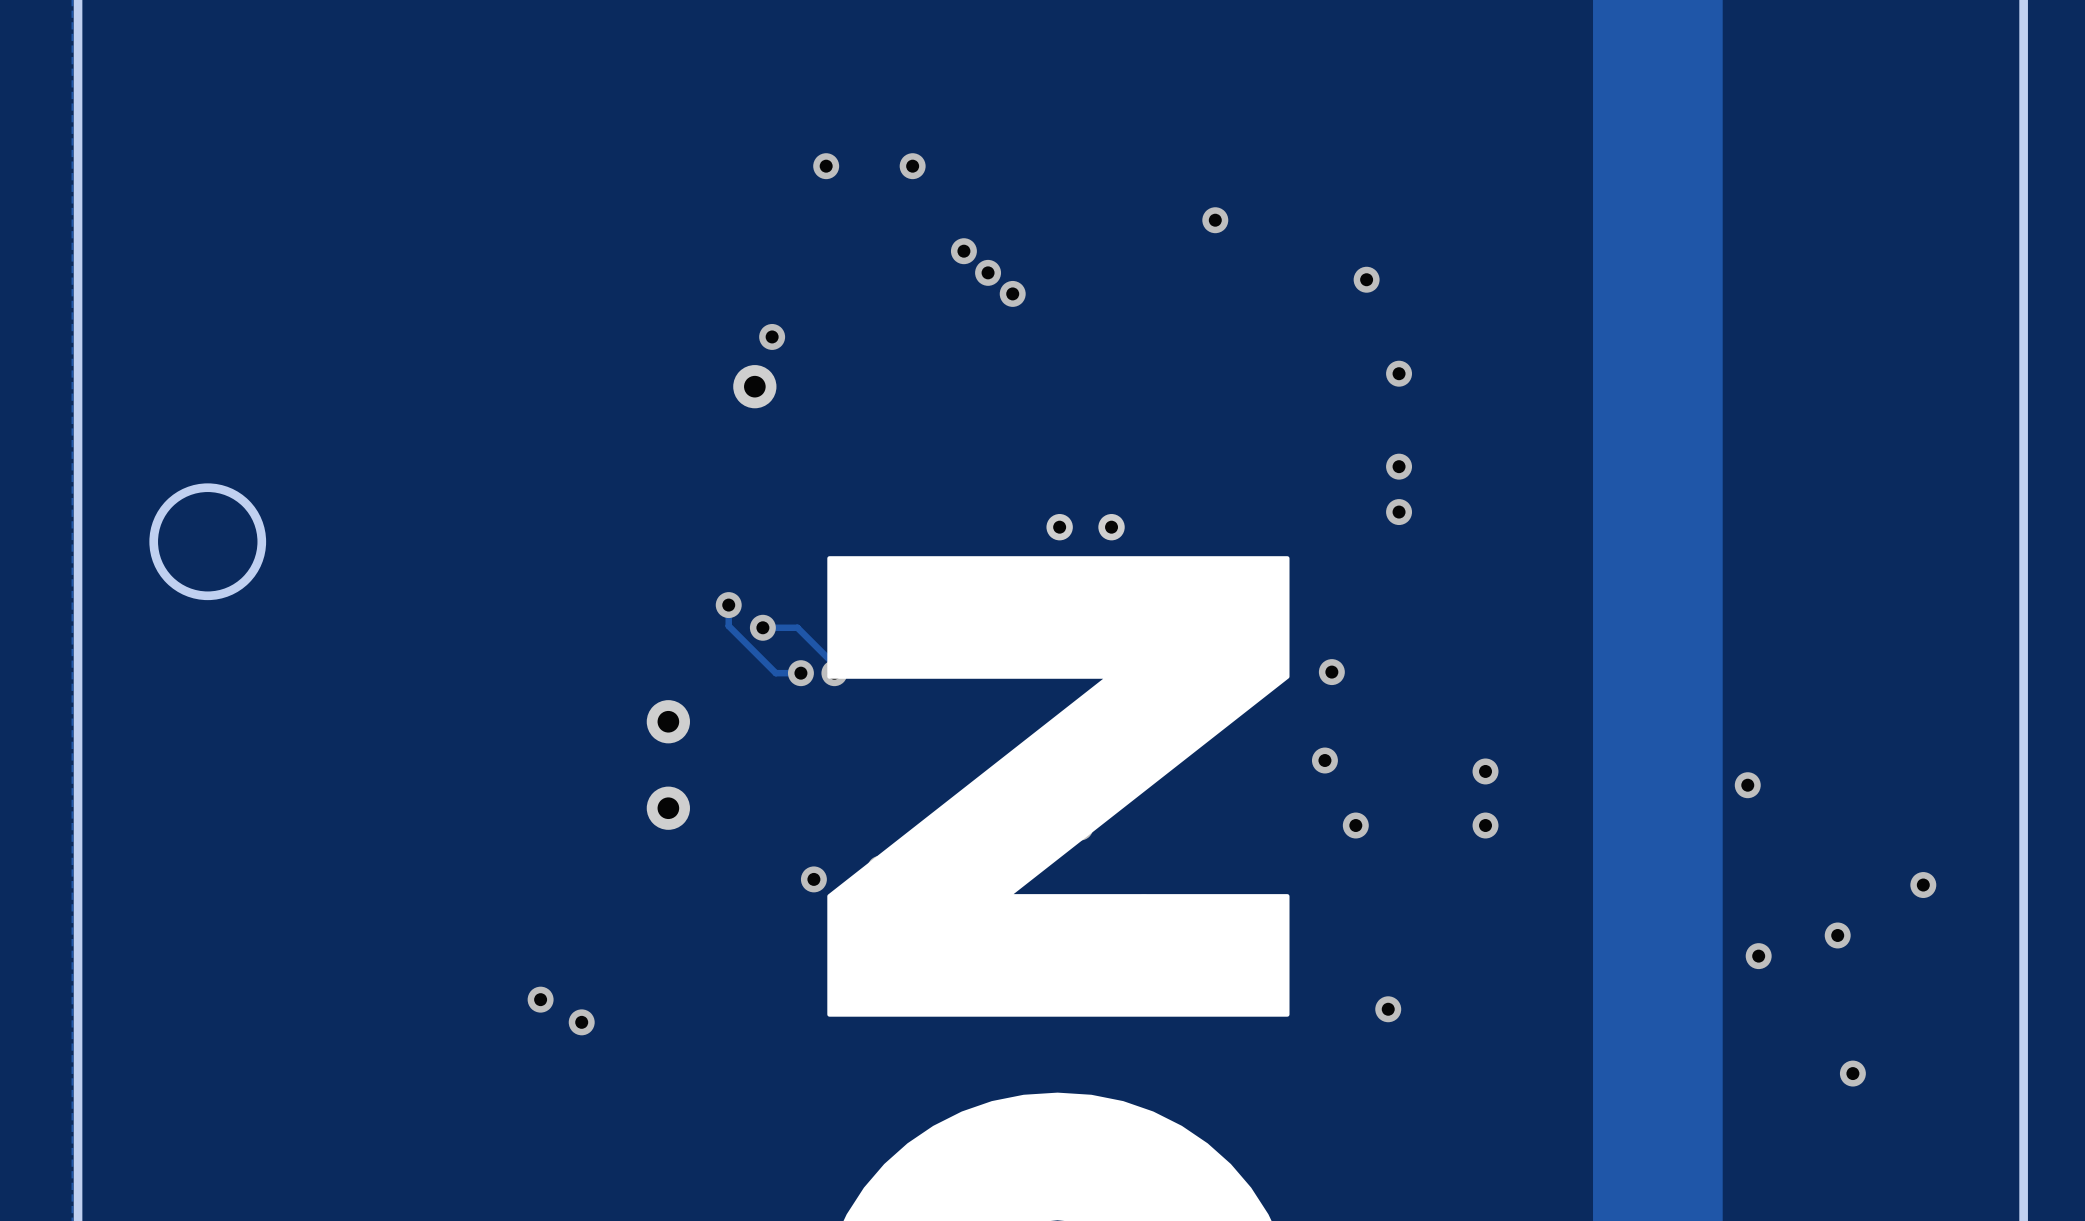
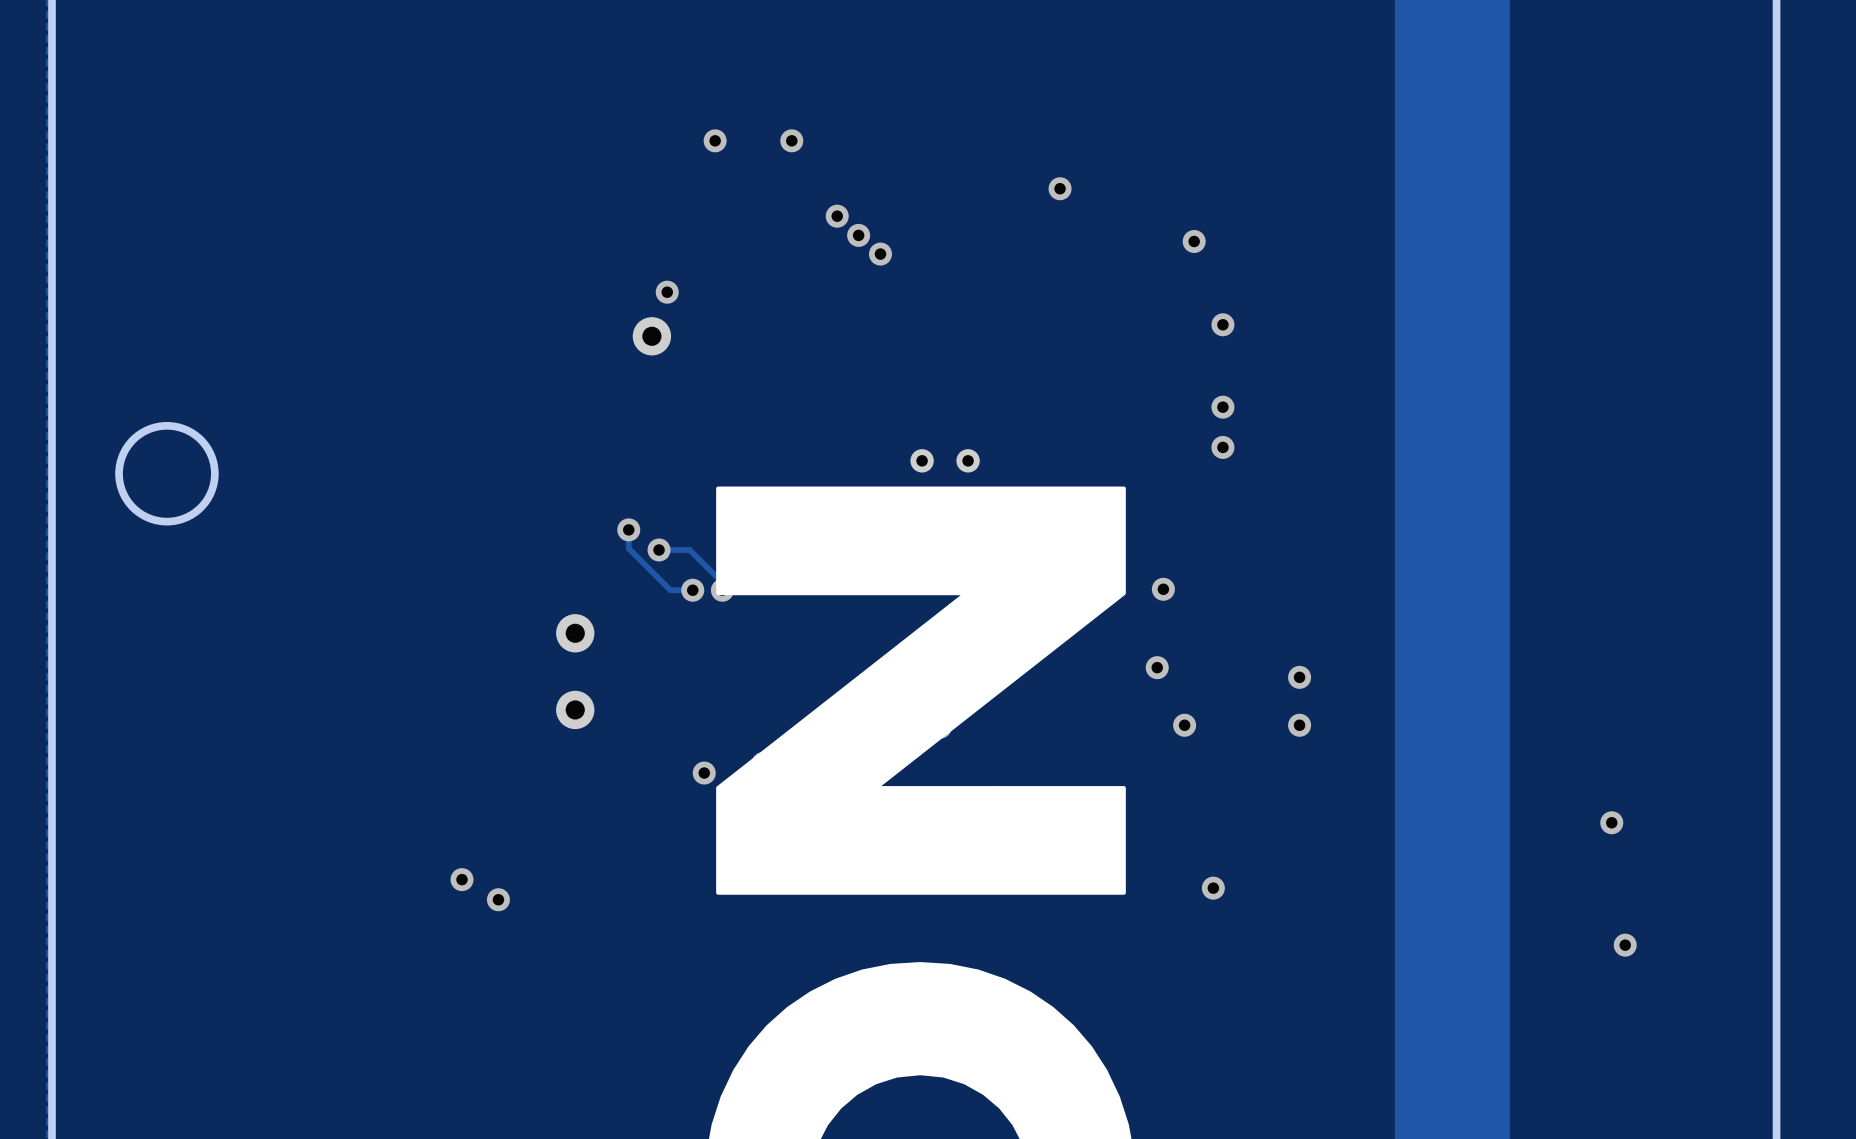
via: (1747, 785) -> none
via: (1923, 885) -> none
via: (1758, 956) -> none

